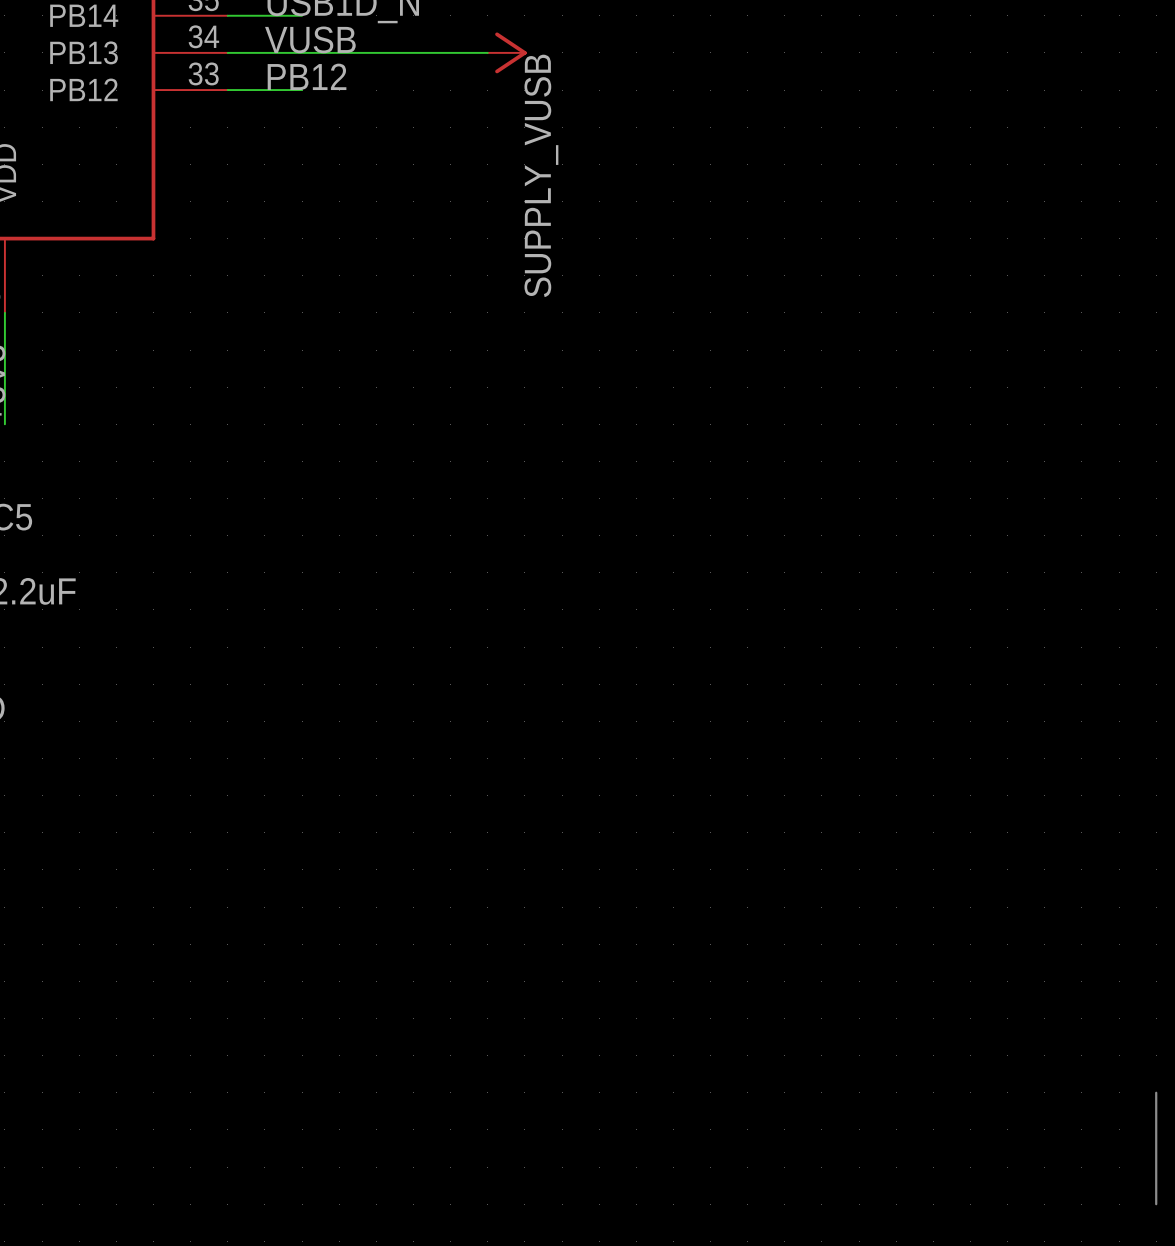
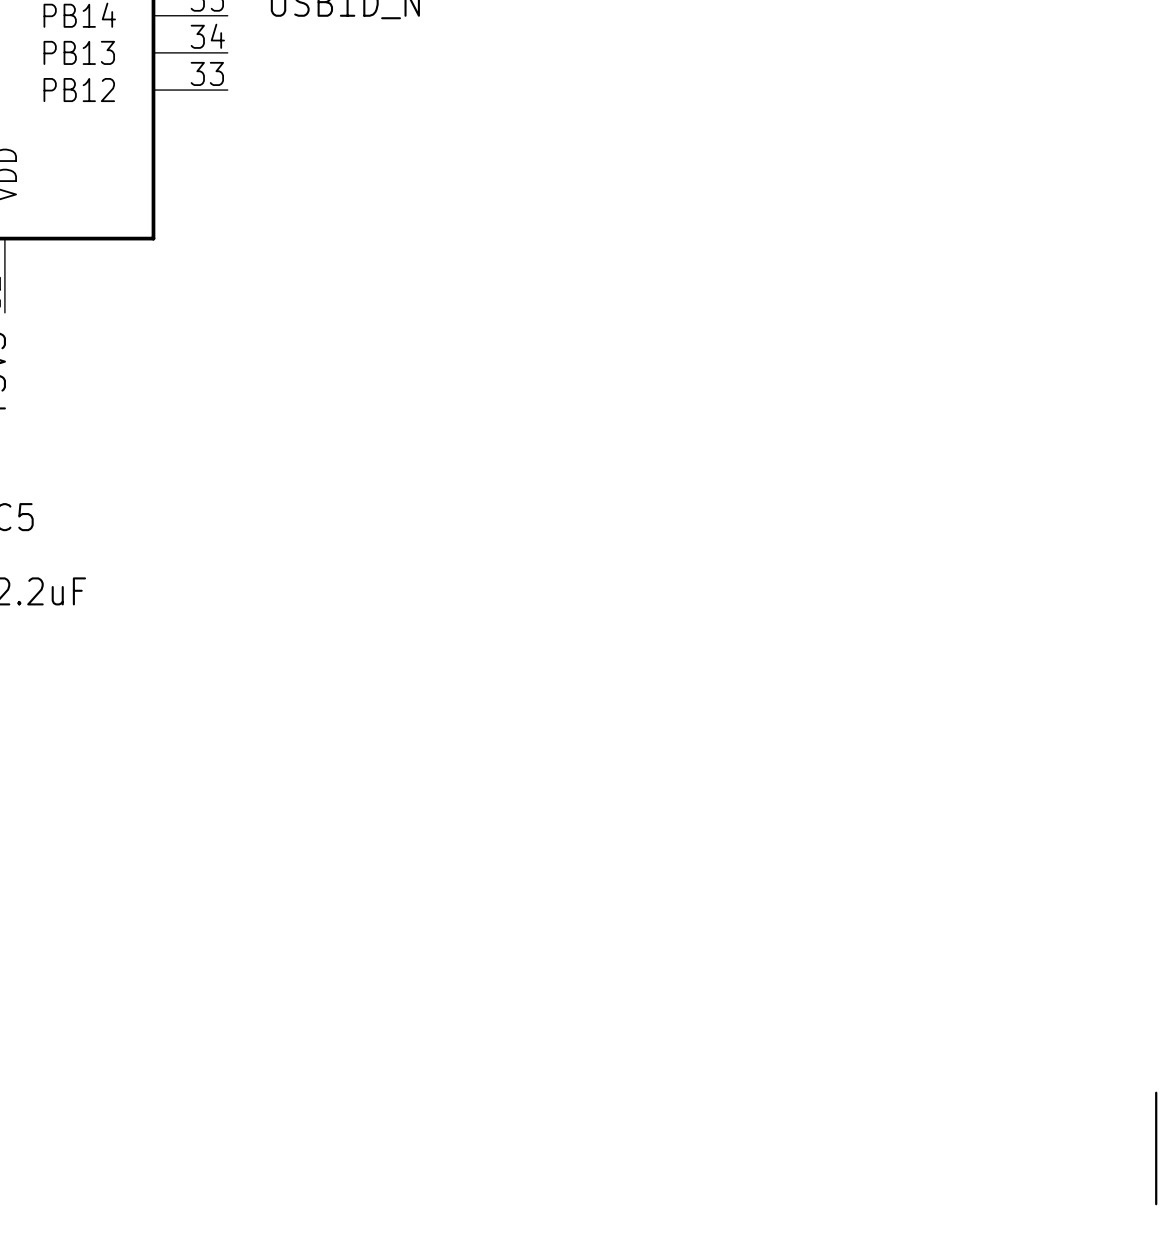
wire: (227, 15) (302, 15) -> none
label: VUSB (310, 39) -> none
wire: (227, 52) (487, 52) -> none
power symbol: SUPPLY_VUSB (507, 52) -> none
label: PB12 (307, 76) -> none
wire: (227, 90) (302, 90) -> none
wire: (4, 312) (4, 424) -> none

